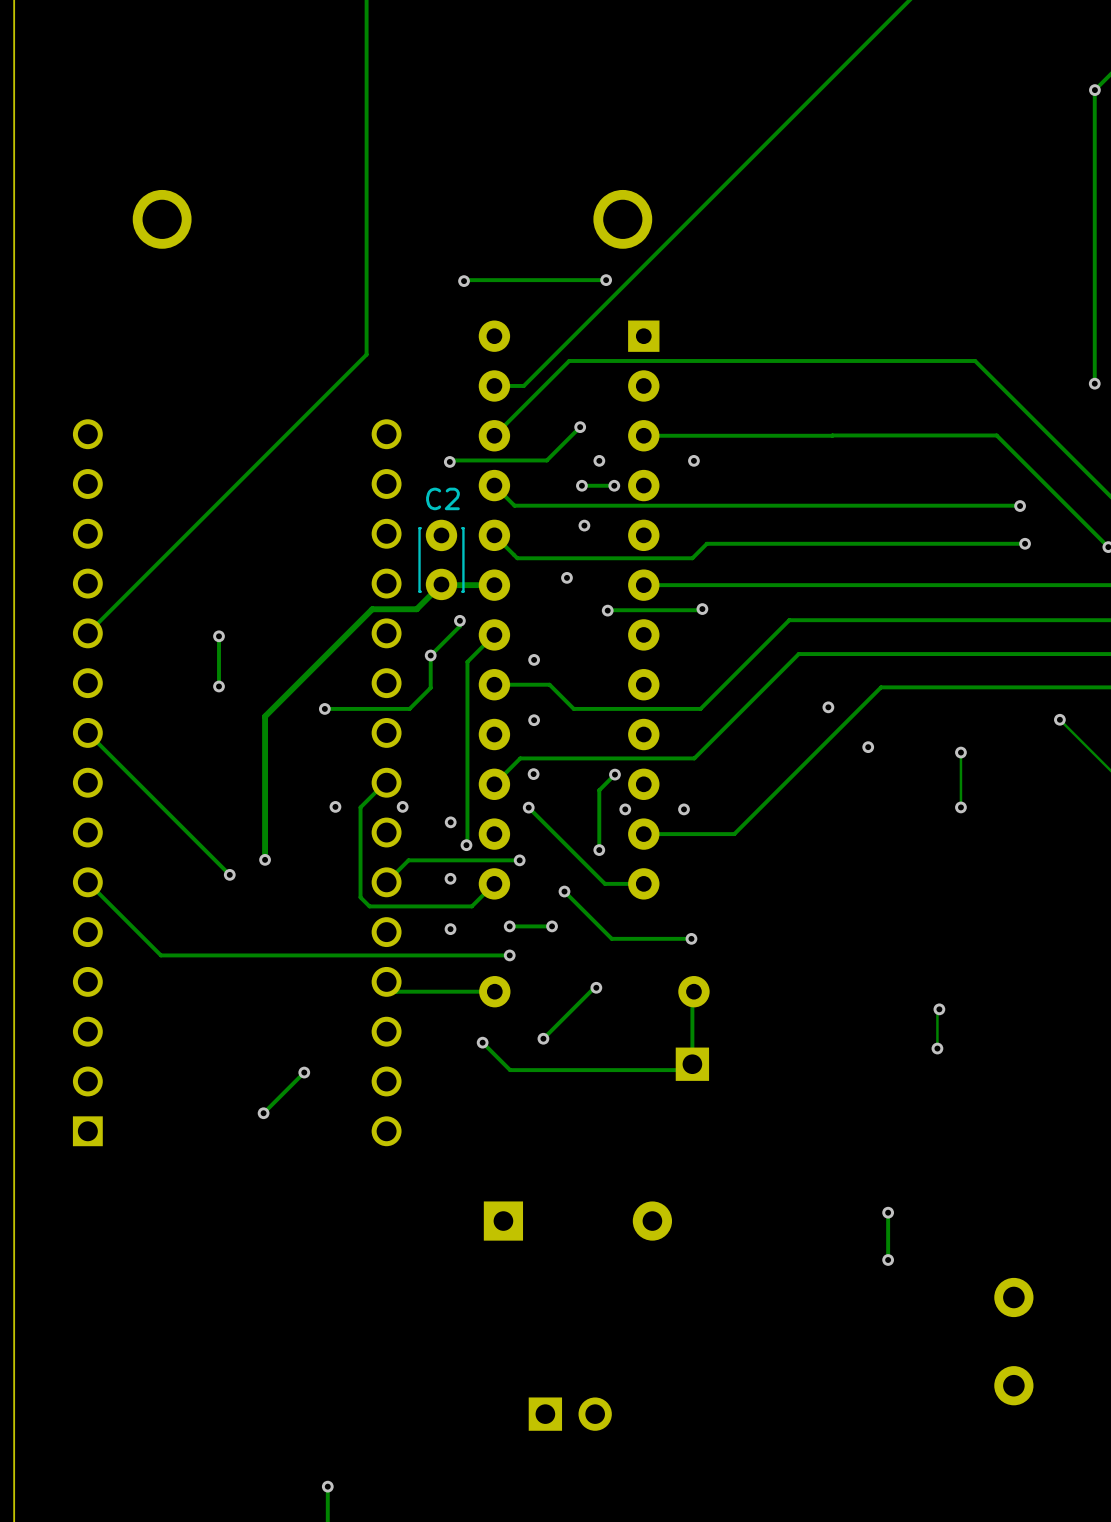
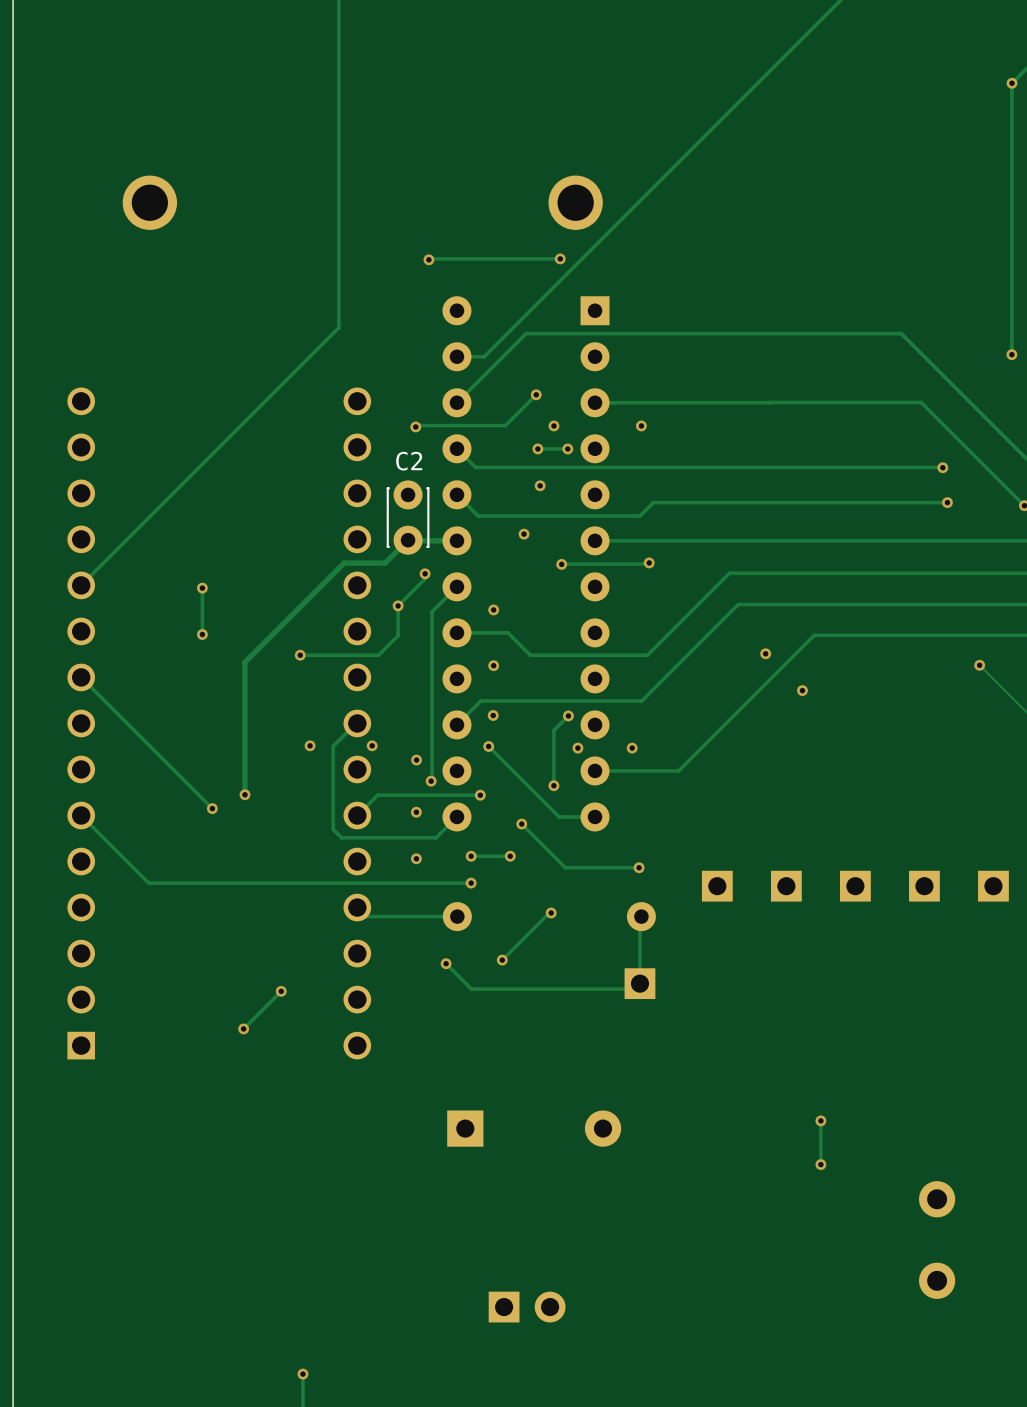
track: (960, 752) (960, 807) -> none
via: (960, 752) -> none
via: (960, 807) -> none
part: none -> (717, 886)
part: none -> (786, 886)
part: none -> (855, 886)
part: none -> (924, 886)
part: none -> (993, 886)
track: (939, 1009) (937, 1011) (937, 1048) -> none
via: (939, 1009) -> none
via: (937, 1048) -> none

